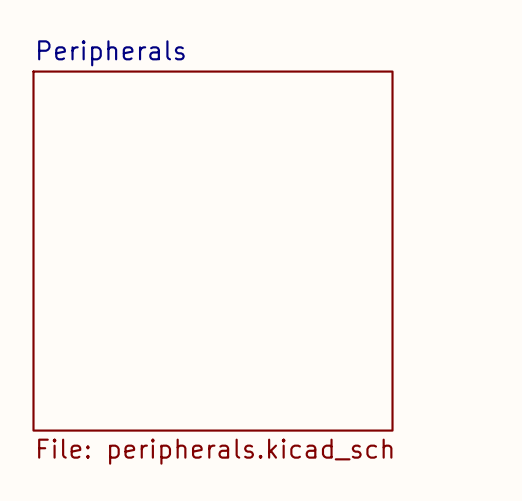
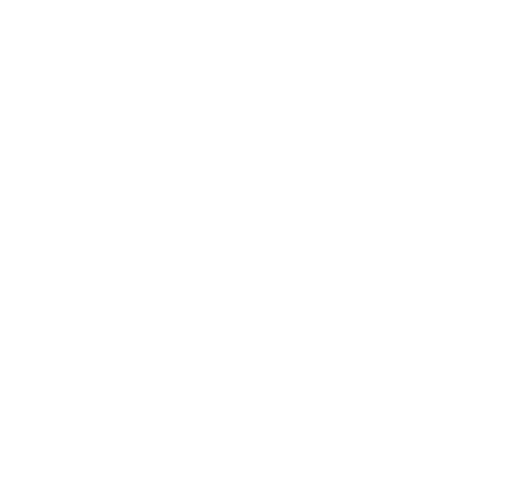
sheet Peripherals: File: peripherals.kicad_sch (213, 251) -> none

